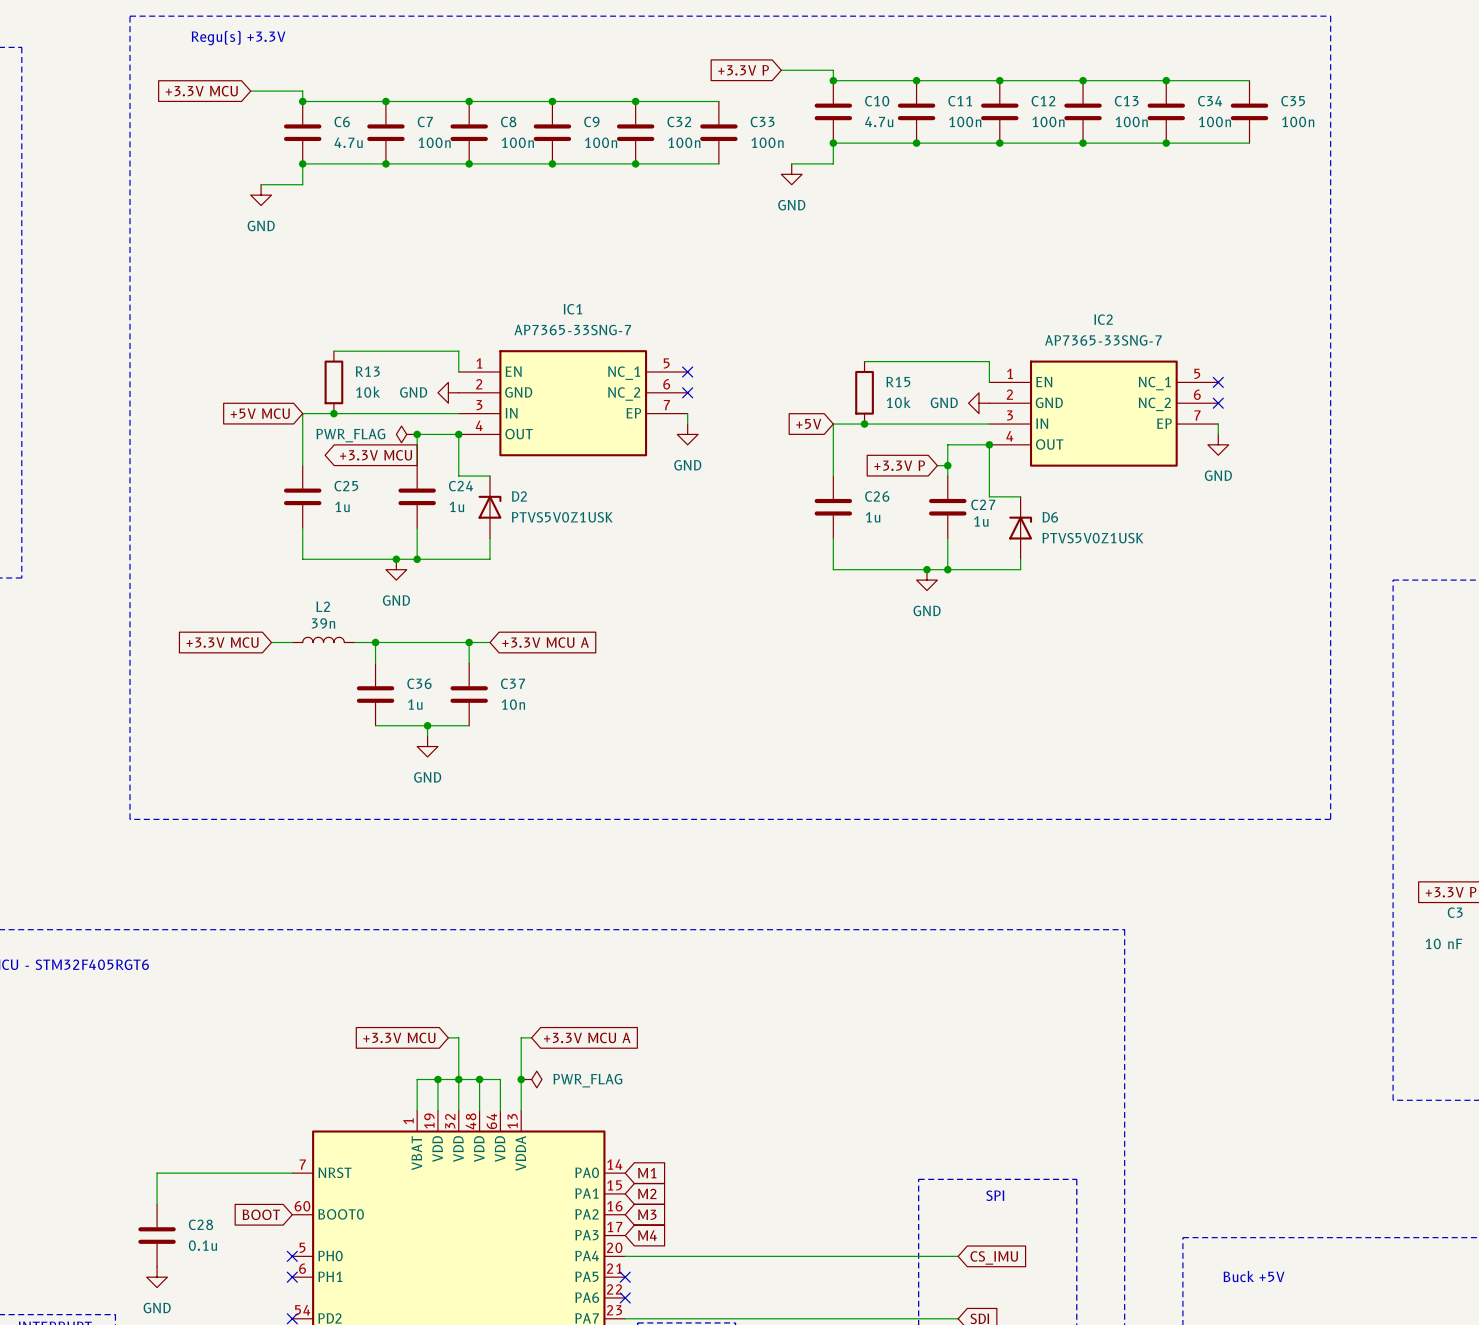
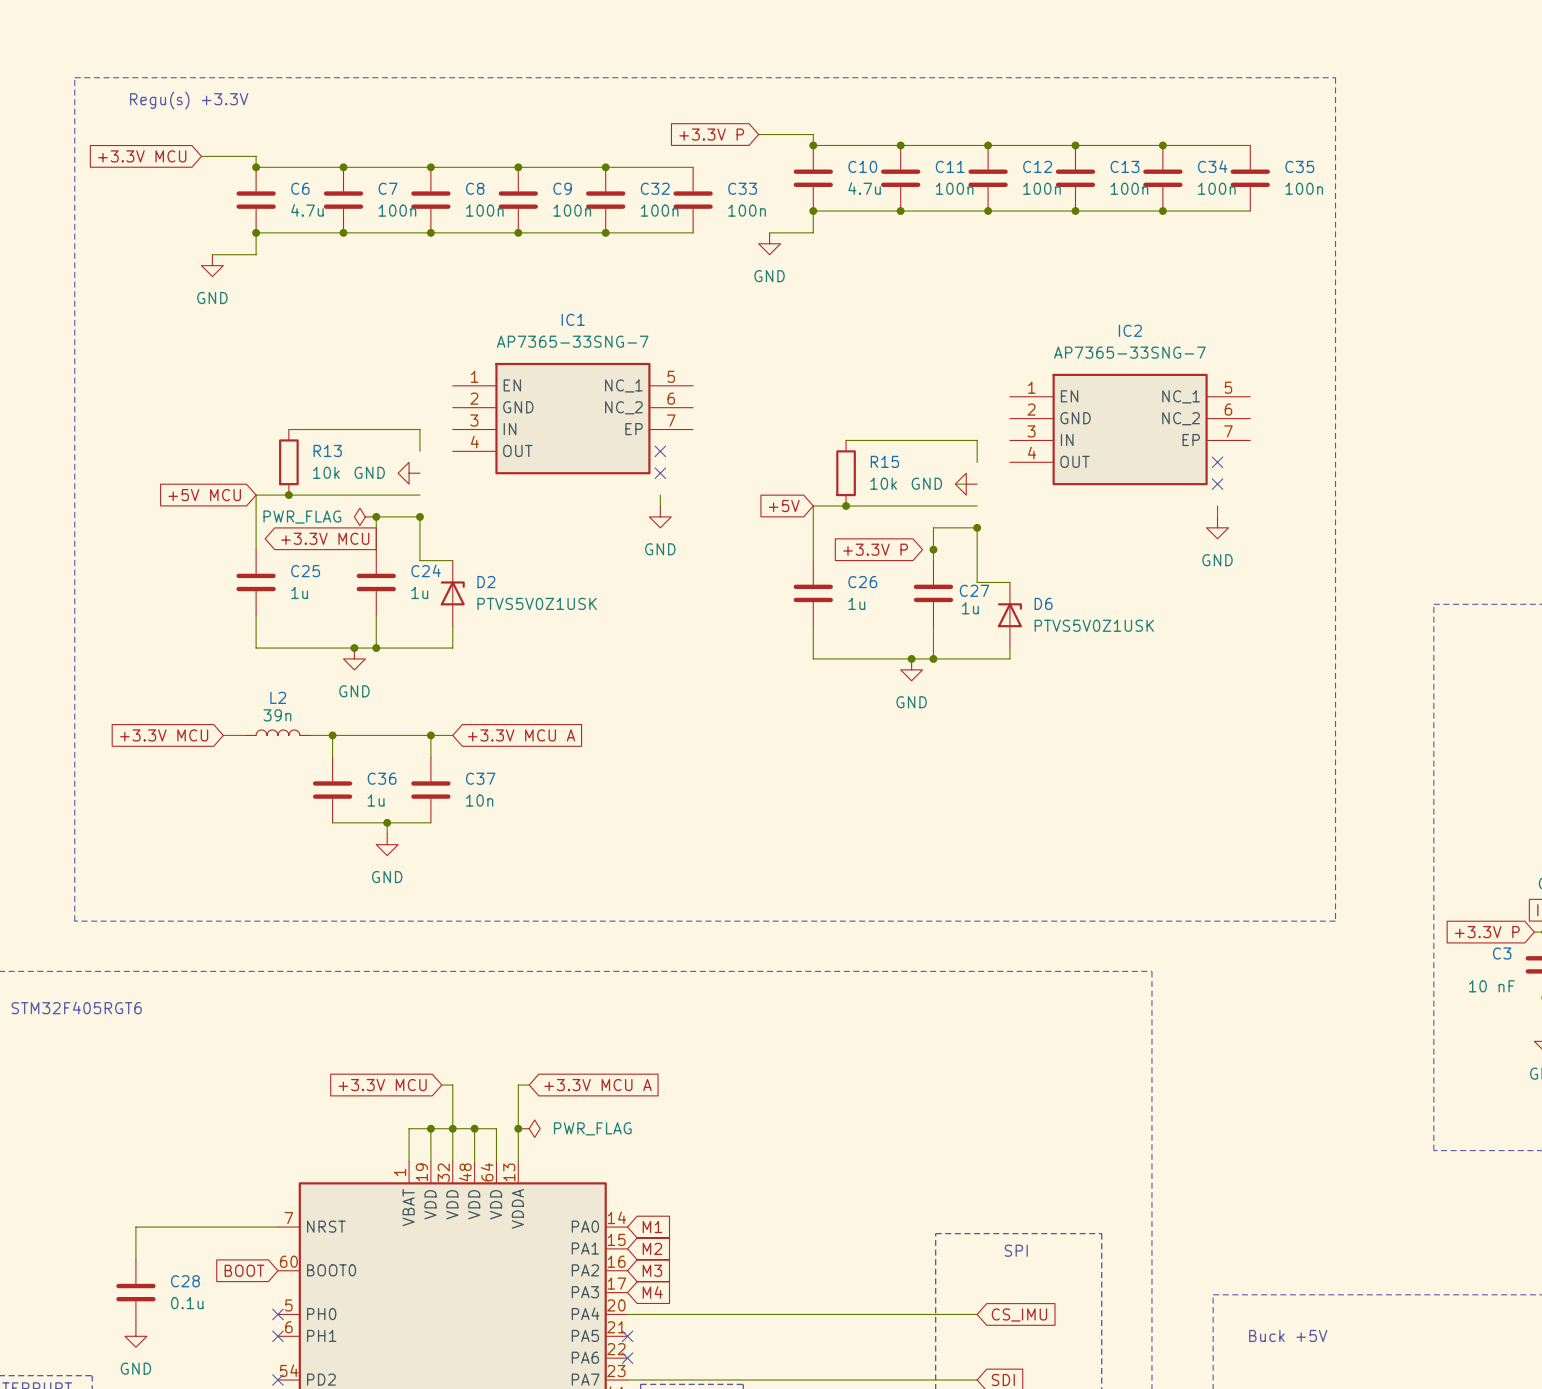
line: (130, 16) (1330, 16) (1330, 819) (130, 819) (130, 16) -> (74, 77) (1335, 77) (1335, 921) (74, 921) (74, 77)
text position: Regu(s) +3.3V (238, 38) -> Regu(s) +3.3V (189, 100)
global label position: +3.3V P (743, 70) -> +3.3V P (711, 134)
wire: (781, 70) (833, 70) (833, 80) (1249, 80) -> none
junction: (833, 80) -> none
junction: (916, 80) -> none
junction: (999, 80) -> none
junction: (1083, 80) -> none
junction: (1166, 80) -> none
global label position: +3.3V MCU (201, 91) -> +3.3V MCU (142, 156)
wire: (250, 91) (302, 91) (302, 101) (718, 101) -> none
junction: (302, 101) -> none
junction: (385, 101) -> none
junction: (469, 101) -> none
junction: (552, 101) -> none
junction: (635, 101) -> none
C10 position: (833, 111) -> (813, 178)
C11 position: (916, 111) -> (900, 178)
C12 position: (999, 111) -> (988, 178)
C13 position: (1083, 111) -> (1075, 178)
C34 position: (1166, 111) -> (1162, 178)
C35 position: (1249, 111) -> (1250, 178)
C6 position: (302, 132) -> (256, 200)
C7 position: (385, 132) -> (343, 200)
C8 position: (469, 132) -> (430, 200)
C9 position: (552, 132) -> (518, 200)
C32 position: (635, 132) -> (605, 200)
C33 position: (718, 132) -> (693, 200)
junction: none -> (813, 145)
wire: (833, 143) (833, 163) (791, 163) -> (846, 145) (813, 145) (813, 134) (758, 134)
junction: (833, 143) -> none
junction: none -> (900, 145)
junction: (916, 143) -> none
junction: none -> (988, 145)
junction: (999, 143) -> none
junction: none -> (1075, 145)
junction: (1083, 143) -> none
junction: none -> (1162, 145)
junction: (1166, 143) -> none
wire: (1218, 143) (1249, 143) -> none
junction: none -> (256, 167)
wire: (302, 163) (302, 184) (261, 184) -> (288, 167) (256, 167) (256, 156) (201, 156)
junction: (302, 163) -> none
junction: none -> (343, 167)
junction: (385, 163) -> none
junction: none -> (430, 167)
junction: (469, 163) -> none
junction: none -> (518, 167)
junction: (552, 163) -> none
junction: none -> (605, 167)
junction: (635, 163) -> none
wire: (687, 163) (718, 163) -> none
power symbol position: GND (791, 174) -> GND (769, 243)
power symbol position: GND (261, 195) -> GND (212, 265)
junction: none -> (813, 211)
junction: none -> (900, 211)
junction: none -> (988, 211)
junction: none -> (1075, 211)
junction: none -> (1162, 211)
wire: none -> (1250, 211) (813, 211) (813, 232) (769, 232)
junction: none -> (256, 232)
junction: none -> (343, 232)
junction: none -> (430, 232)
junction: none -> (518, 232)
junction: none -> (605, 232)
wire: none -> (693, 232) (256, 232) (256, 254) (212, 254)
wire: (333, 351) (458, 351) (458, 372) -> none
wire: (864, 361) (989, 361) (989, 382) -> none
no-connect mark: (687, 372) -> none
R13 position: (333, 382) -> (288, 462)
no-connect mark: (1218, 382) -> none
power symbol: GND (448, 392) -> none
no-connect mark: (687, 392) -> none
R15 position: (864, 392) -> (846, 473)
power symbol: GND (978, 403) -> none
no-connect mark: (1218, 403) -> none
global label position: +5V MCU (260, 413) -> +5V MCU (204, 495)
wire: (302, 413) (302, 465) -> none
junction: (333, 413) -> none
wire: (427, 413) (458, 413) -> (419, 429) (419, 451)
wire: (687, 413) (687, 424) -> (660, 495) (660, 505)
global label position: +5V (808, 424) -> +5V (784, 505)
wire: (833, 424) (833, 476) -> none
junction: (864, 424) -> none
wire: (958, 424) (989, 424) -> (977, 440) (977, 462)
wire: (1218, 424) (1218, 434) -> (1217, 505) (1217, 516)
power symbol position: PWR_FLAG (406, 434) -> PWR_FLAG (365, 516)
junction: (417, 434) -> none
junction: (458, 434) -> none
no-connect mark: none -> (660, 451)
power symbol position: GND (687, 434) -> GND (660, 516)
junction: (989, 444) -> none
no-connect mark: none -> (1217, 462)
power symbol position: GND (1218, 444) -> GND (1217, 527)
global label position: +3.3V MCU (376, 455) -> +3.3V MCU (325, 538)
power symbol: none -> GND (409, 473)
no-connect mark: none -> (660, 473)
wire: (417, 465) (417, 434) (458, 434) (458, 476) (489, 476) -> (376, 549) (376, 516) (419, 516) (419, 560) (452, 560)
global label position: +3.3V P (899, 465) -> +3.3V P (875, 549)
junction: (947, 465) -> none
power symbol: none -> GND (966, 484)
no-connect mark: none -> (1217, 484)
junction: none -> (288, 495)
wire: none -> (419, 495) (256, 495) (256, 549)
wire: (947, 476) (947, 444) (989, 444) (989, 496) (1020, 496) -> (933, 560) (933, 527) (977, 527) (977, 582) (1009, 582)
junction: none -> (846, 505)
wire: none -> (977, 505) (813, 505) (813, 560)
C25 position: (302, 496) -> (256, 582)
junction: none -> (376, 516)
C24 position: (417, 496) -> (376, 582)
junction: none -> (419, 516)
D2 position: (489, 507) -> (452, 593)
C26 position: (833, 507) -> (813, 593)
C27 position: (947, 507) -> (933, 593)
junction: none -> (977, 527)
wire: (302, 528) (302, 559) (489, 559) (489, 538) -> (256, 615) (256, 648) (452, 648) (452, 626)
wire: (417, 528) (417, 559) -> (376, 615) (376, 648)
junction: none -> (933, 549)
D6 position: (1020, 528) -> (1009, 615)
wire: (833, 538) (833, 569) (1020, 569) (1020, 559) -> (813, 626) (813, 658) (1009, 658) (1009, 648)
wire: (947, 538) (947, 569) -> (933, 626) (933, 658)
junction: (396, 559) -> none
junction: (417, 559) -> none
power symbol: GND (396, 569) -> none
junction: (926, 569) -> none
junction: (947, 569) -> none
power symbol: GND (926, 580) -> none
junction: none -> (354, 648)
junction: none -> (376, 648)
power symbol: none -> GND (354, 658)
junction: none -> (911, 658)
junction: none -> (933, 658)
L2 position: (323, 639) -> (277, 732)
global label position: +3.3V MCU (222, 642) -> +3.3V MCU (164, 735)
wire: (271, 642) (292, 642) -> (223, 735) (245, 735)
wire: (354, 642) (489, 642) -> (310, 735) (452, 735)
wire: (375, 642) (375, 663) -> (332, 735) (332, 757)
junction: (375, 642) -> none
wire: (469, 642) (469, 663) -> (430, 735) (430, 757)
junction: (469, 642) -> none
global label position: +3.3V MCU A (545, 642) -> +3.3V MCU A (521, 735)
power symbol: none -> GND (911, 669)
C36 position: (375, 694) -> (332, 790)
C37 position: (469, 694) -> (430, 790)
junction: none -> (332, 735)
wire: (375, 725) (469, 725) -> (332, 822) (430, 822)
wire: (427, 725) (427, 736) -> (387, 822) (387, 833)
junction position: (427, 725) -> (430, 735)
power symbol: GND (427, 746) -> none
junction: none -> (387, 822)
power symbol: none -> GND (387, 844)

